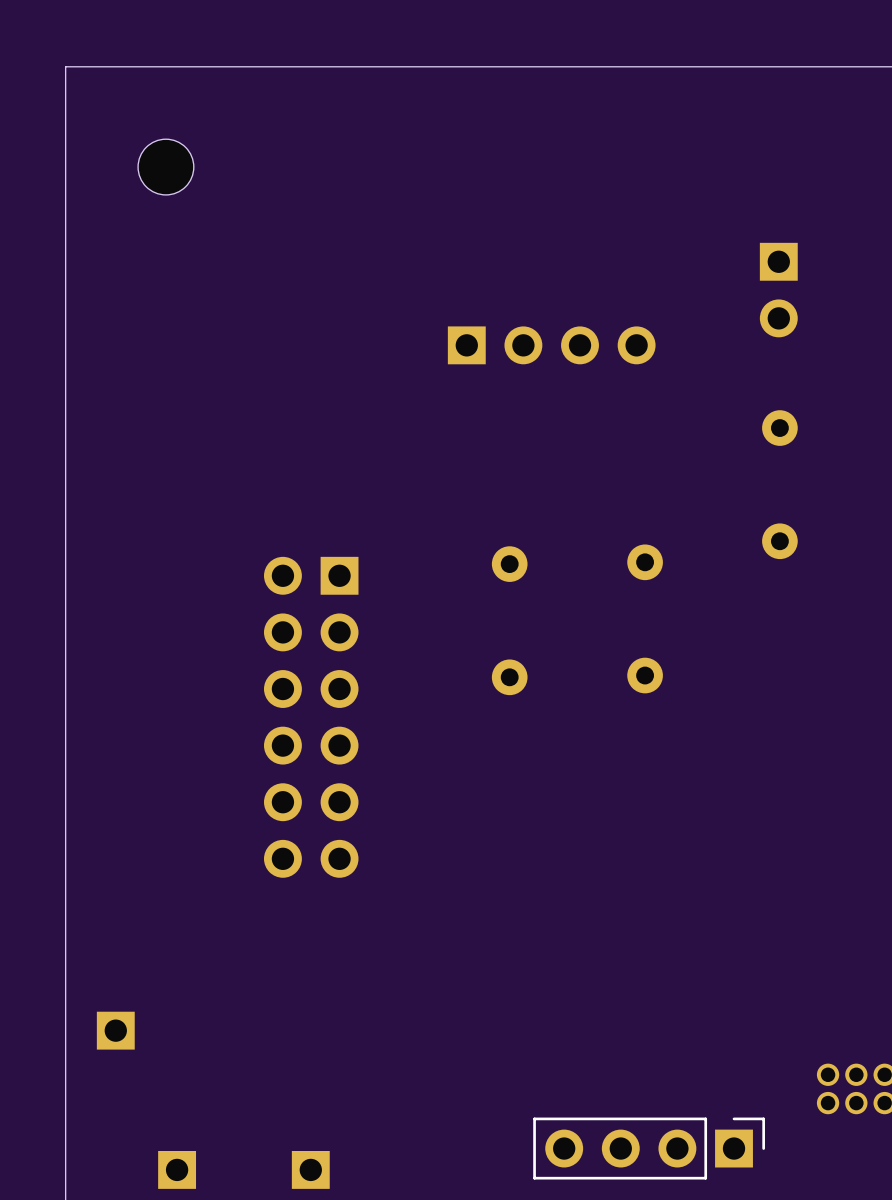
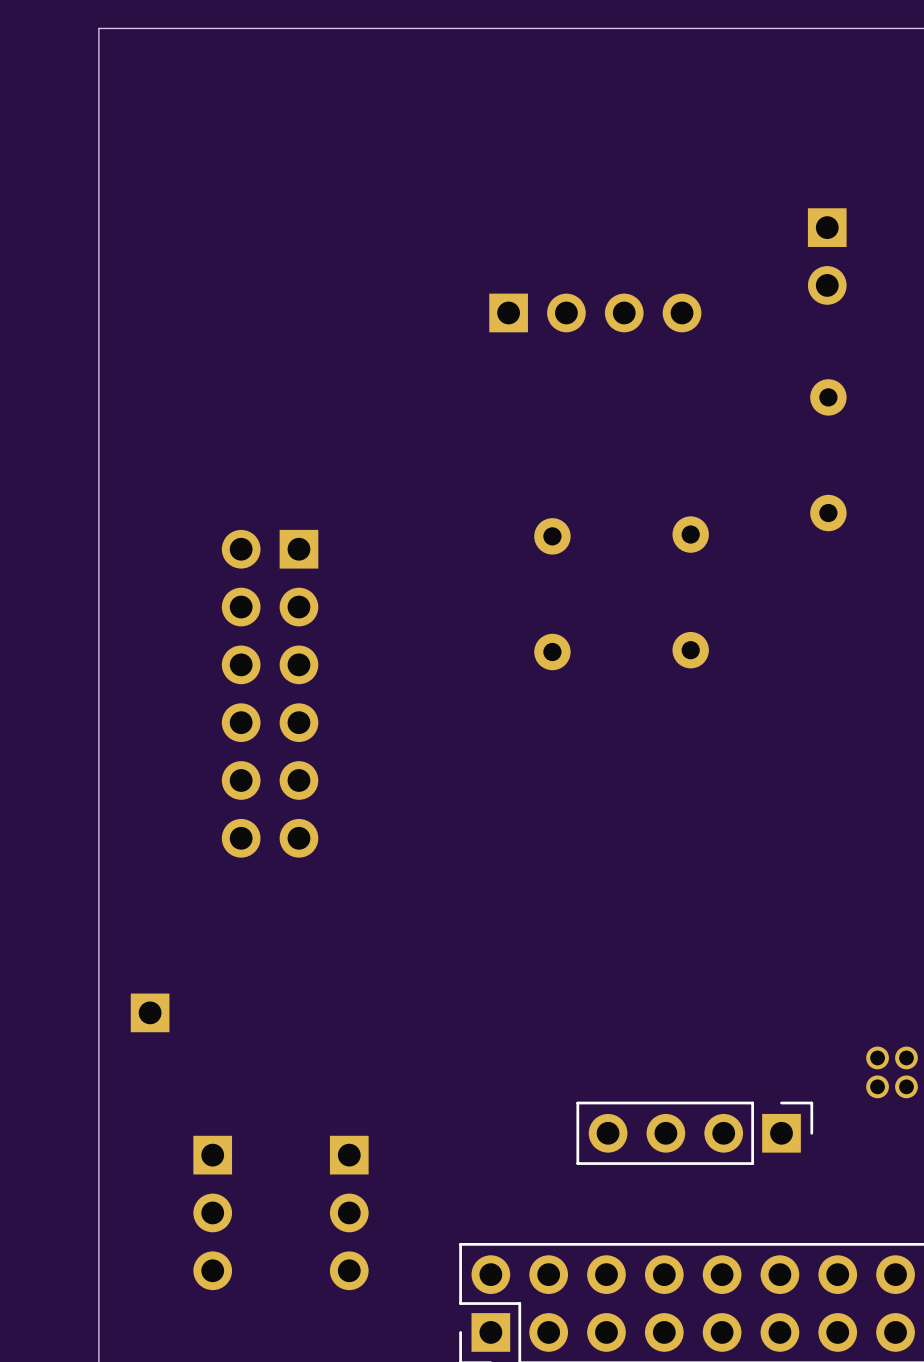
part: (165, 167) -> none
part position: (311, 717) -> (270, 693)

